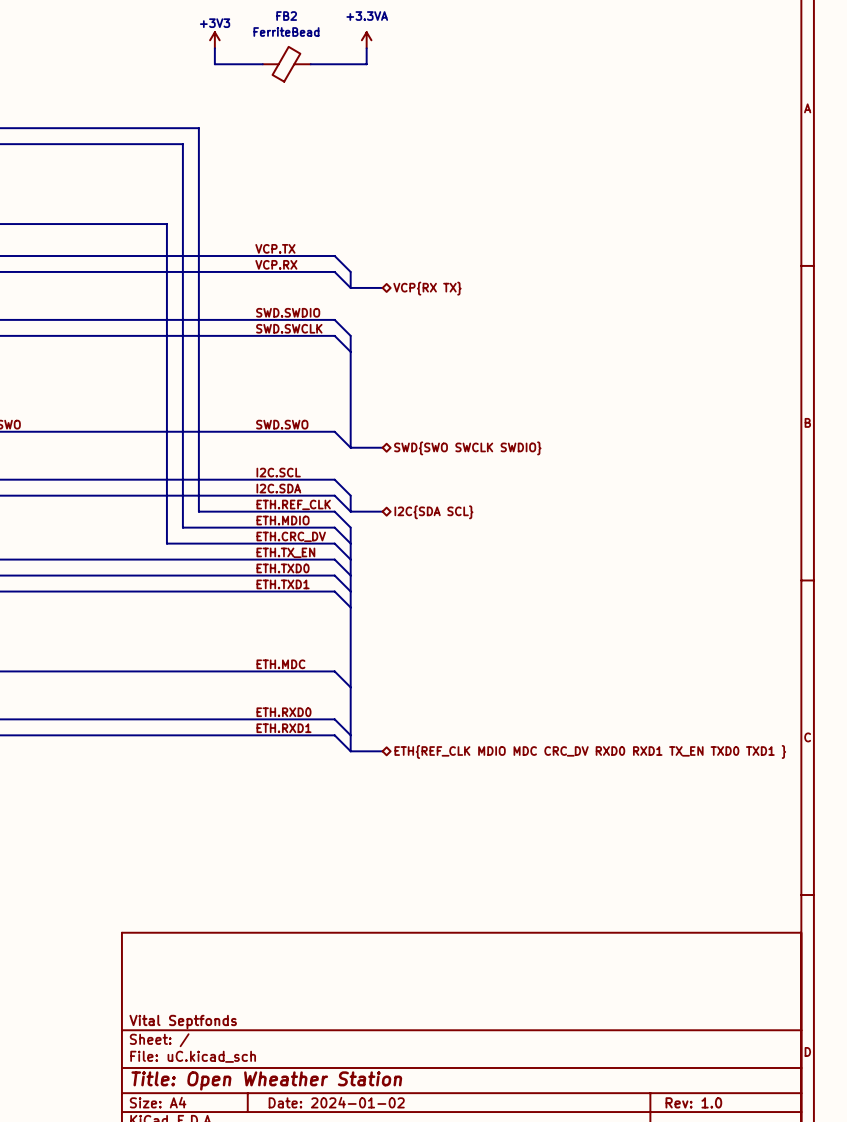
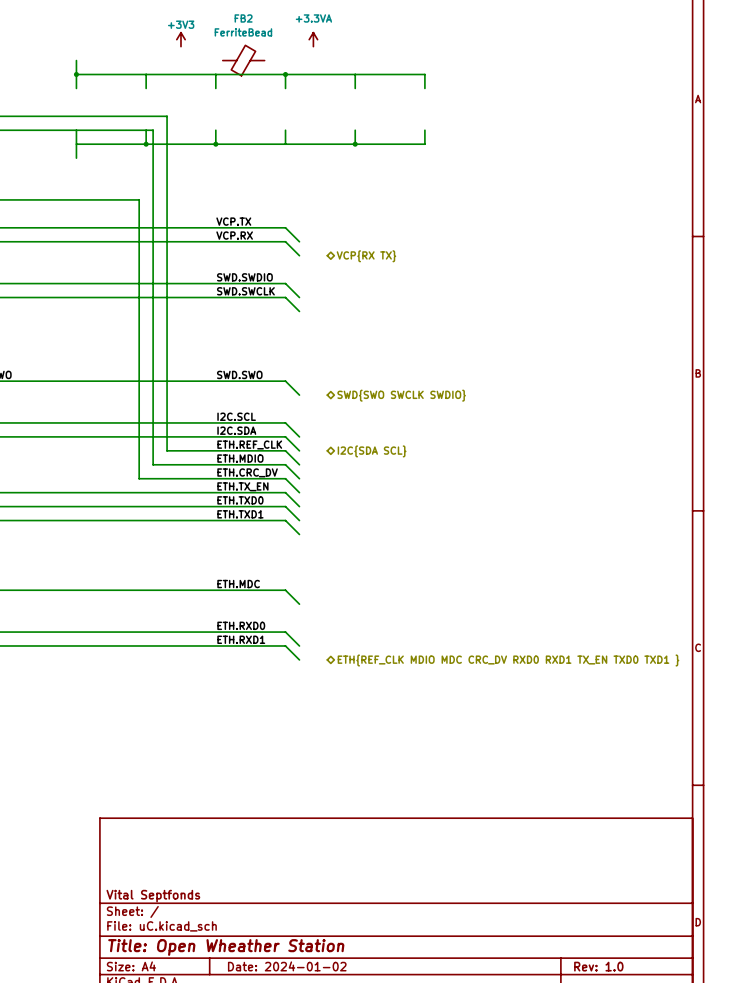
wire: (214, 48) (214, 64) (262, 64) -> none
wire: (366, 48) (366, 64) (310, 64) -> none
wire: none -> (76, 60) (76, 88)
wire: none -> (76, 74) (424, 74) (424, 88)
junction: none -> (76, 74)
wire: none -> (146, 74) (146, 88)
wire: none -> (215, 74) (215, 88)
wire: none -> (285, 74) (285, 88)
junction: none -> (285, 74)
wire: none -> (355, 74) (355, 88)
wire: none -> (76, 130) (76, 158)
wire: none -> (146, 130) (146, 144)
wire: none -> (215, 130) (215, 144)
wire: none -> (285, 130) (285, 144)
wire: none -> (355, 130) (355, 144)
wire: none -> (424, 130) (424, 144) (76, 144)
junction: none -> (146, 144)
junction: none -> (215, 144)
junction: none -> (355, 144)
bus: (350, 271) (350, 287) (382, 287) -> none
bus: (350, 335) (350, 447) (382, 447) -> none
bus: (350, 495) (350, 511) (382, 511) -> none
bus: (350, 527) (350, 751) (382, 751) -> none

